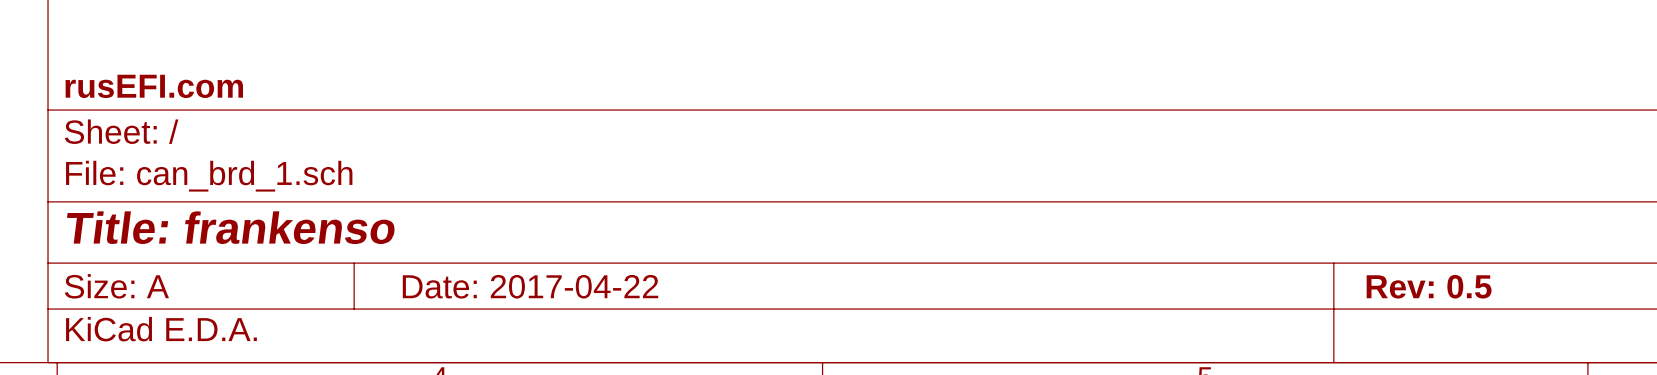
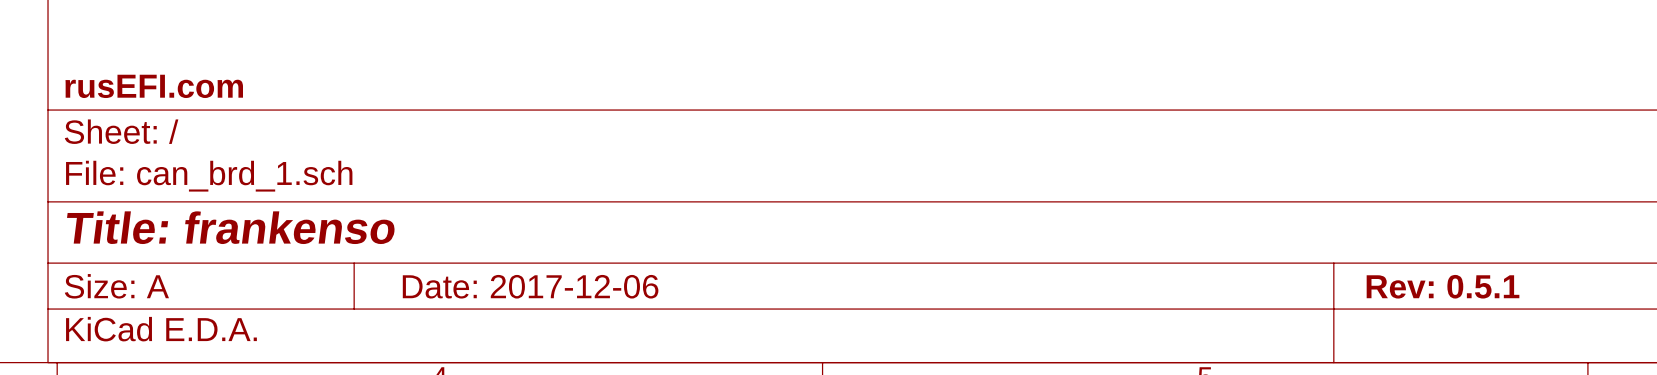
title block: Date: 2017-04-22 (530, 286) -> Date: 2017-12-06 (530, 286)
title block: Rev: 0.5 (1429, 286) -> Rev: 0.5.1 (1443, 286)

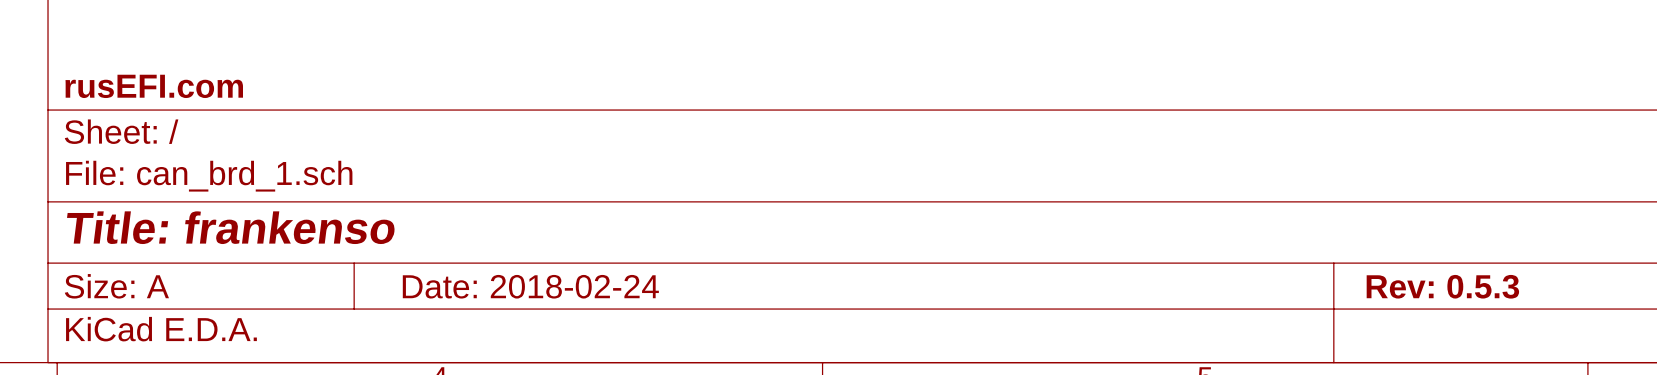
title block: Date: 2017-12-06 (530, 286) -> Date: 2018-02-24 (530, 286)
title block: Rev: 0.5.1 (1443, 286) -> Rev: 0.5.3 (1442, 286)

